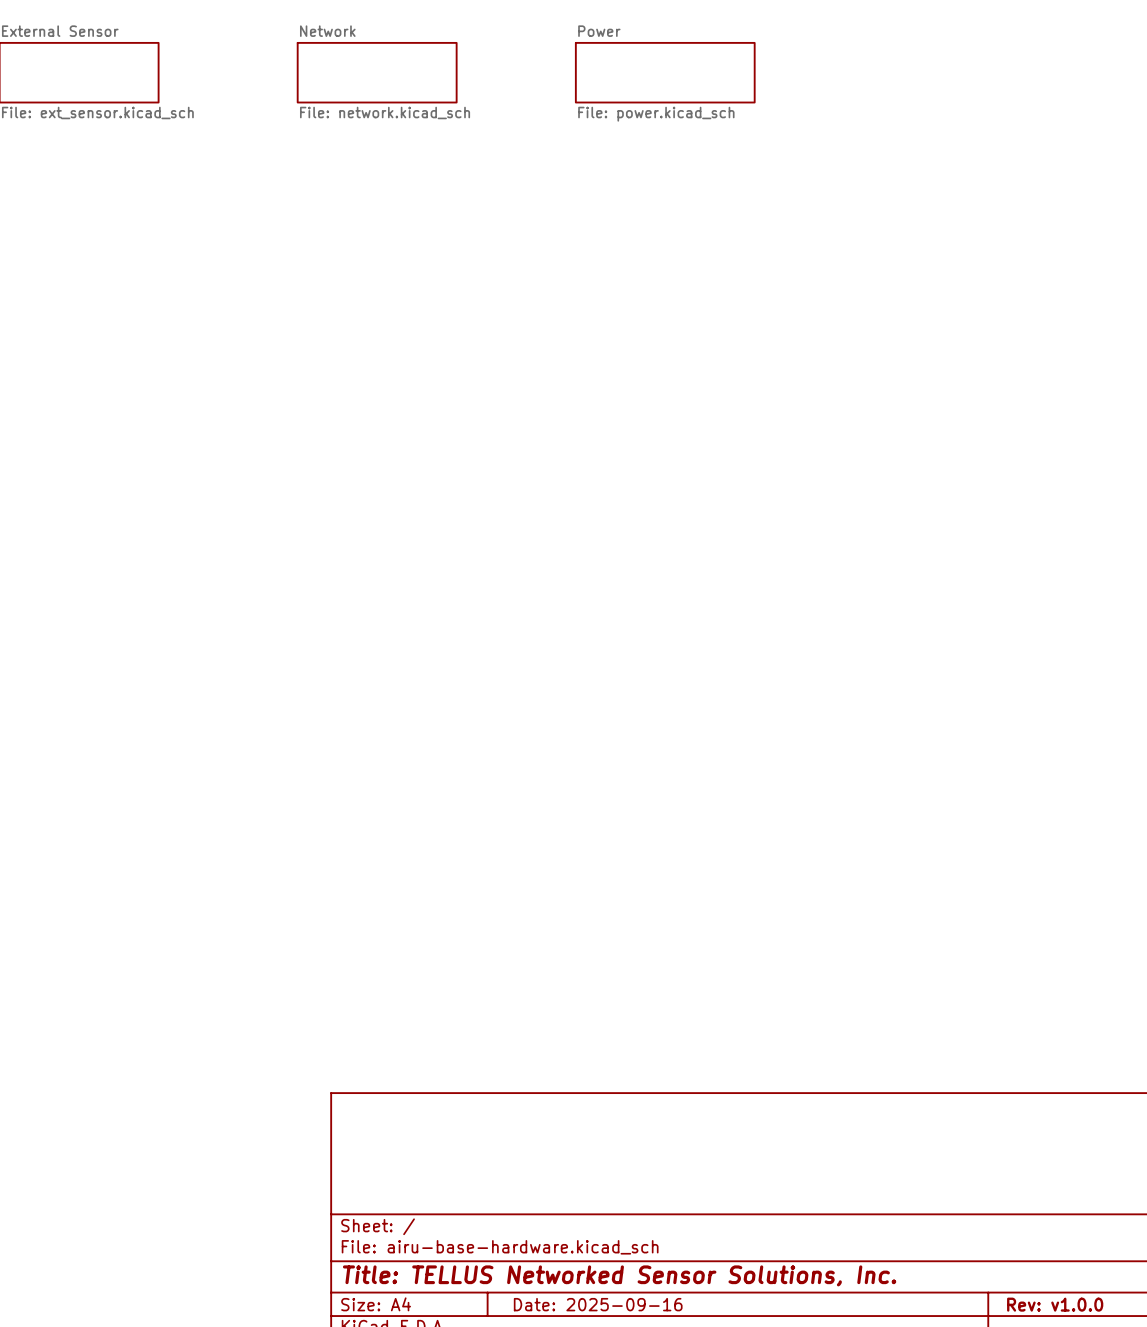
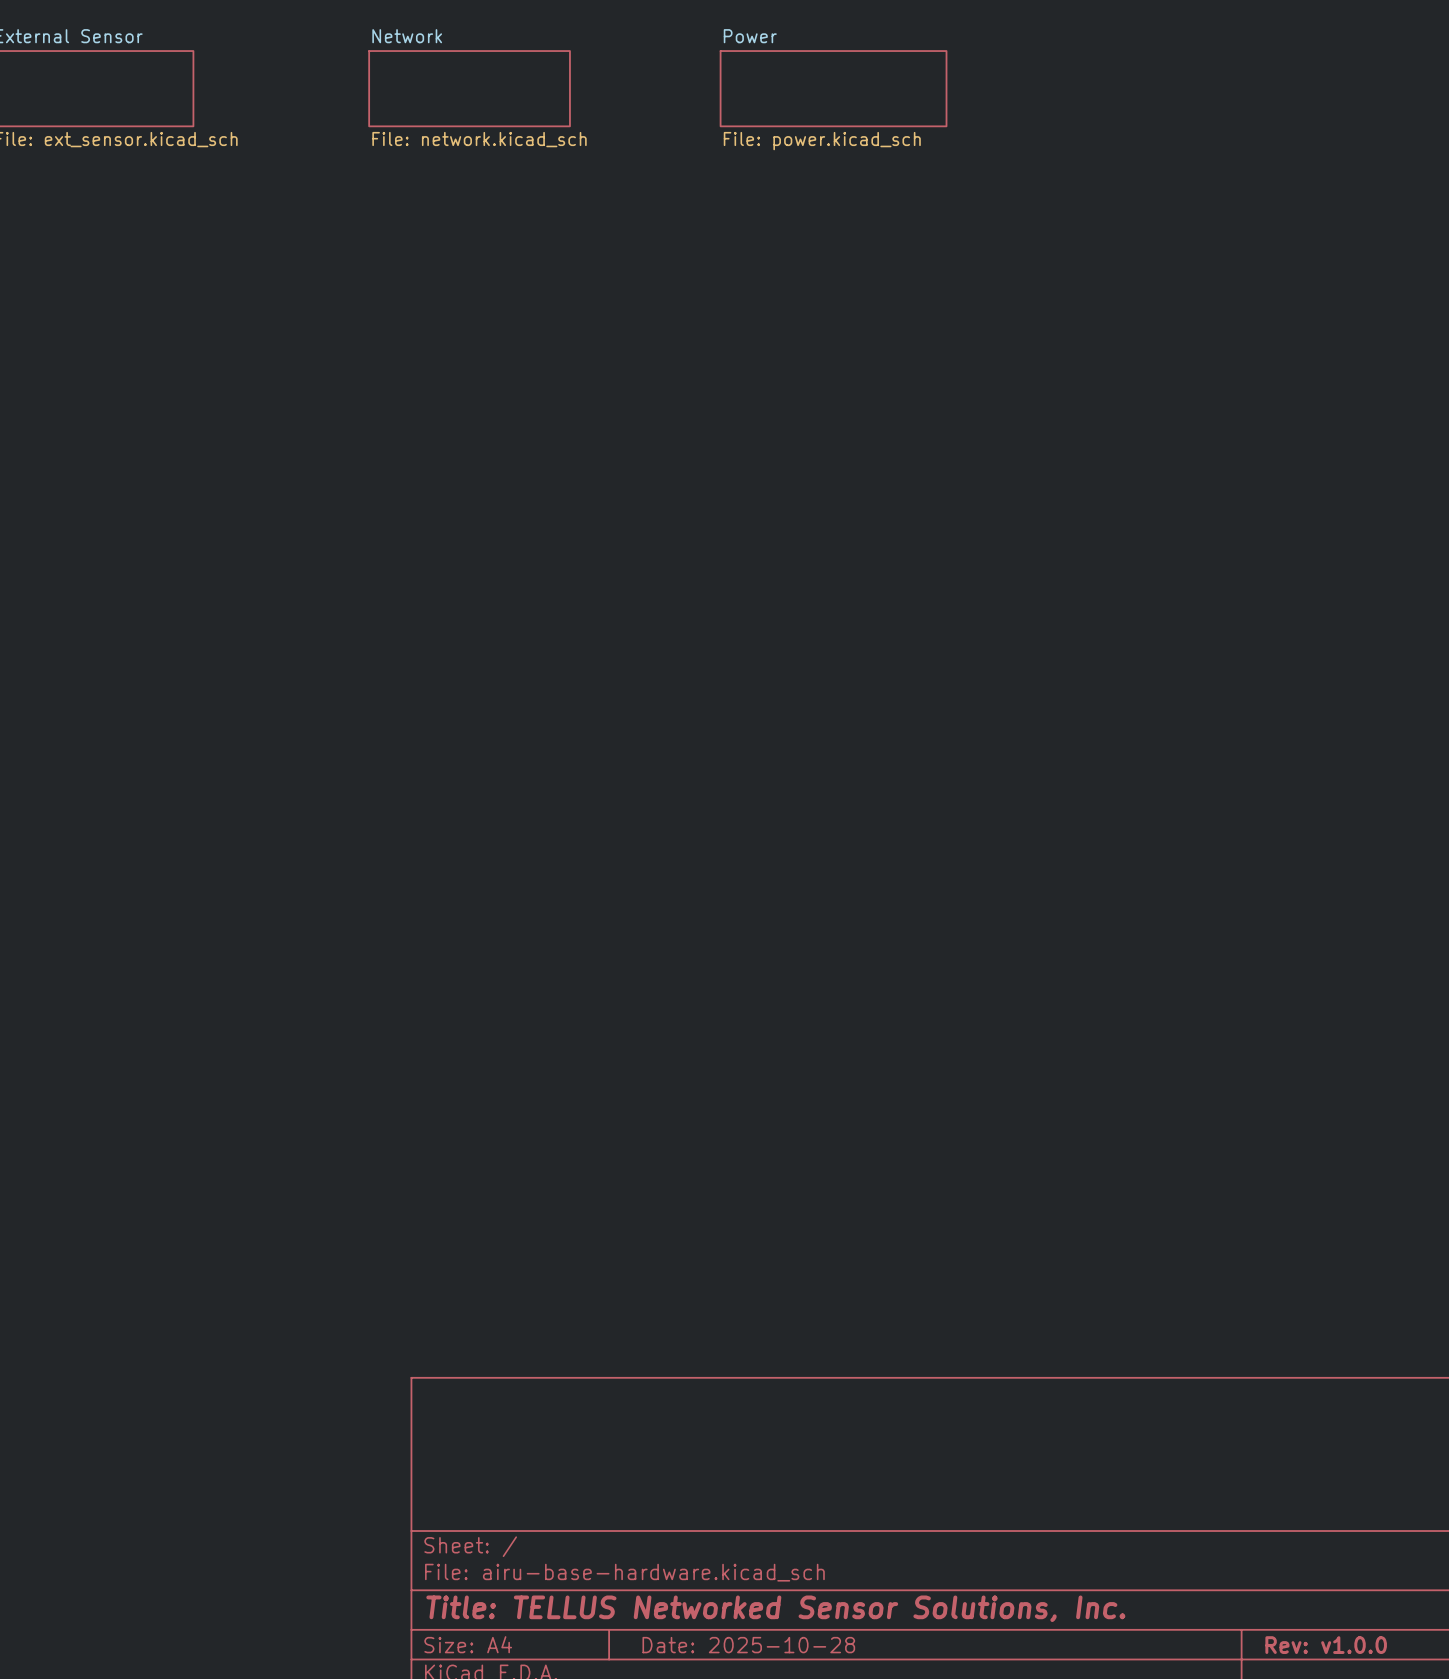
title block: Date: 2025-09-16 (598, 1304) -> Date: 2025-10-28 (748, 1645)

